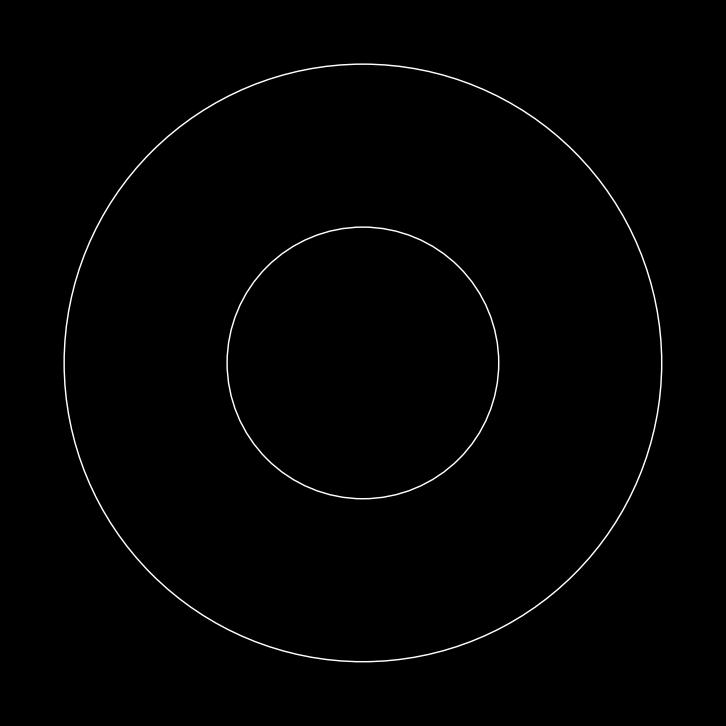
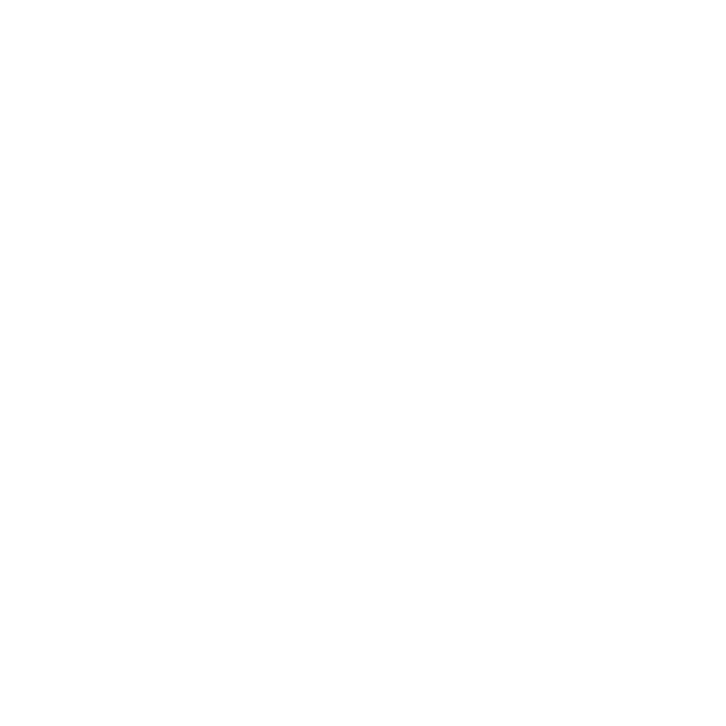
round board edge: [63, 63, 662, 662] -> none
round board edge: [226, 226, 499, 499] -> none

